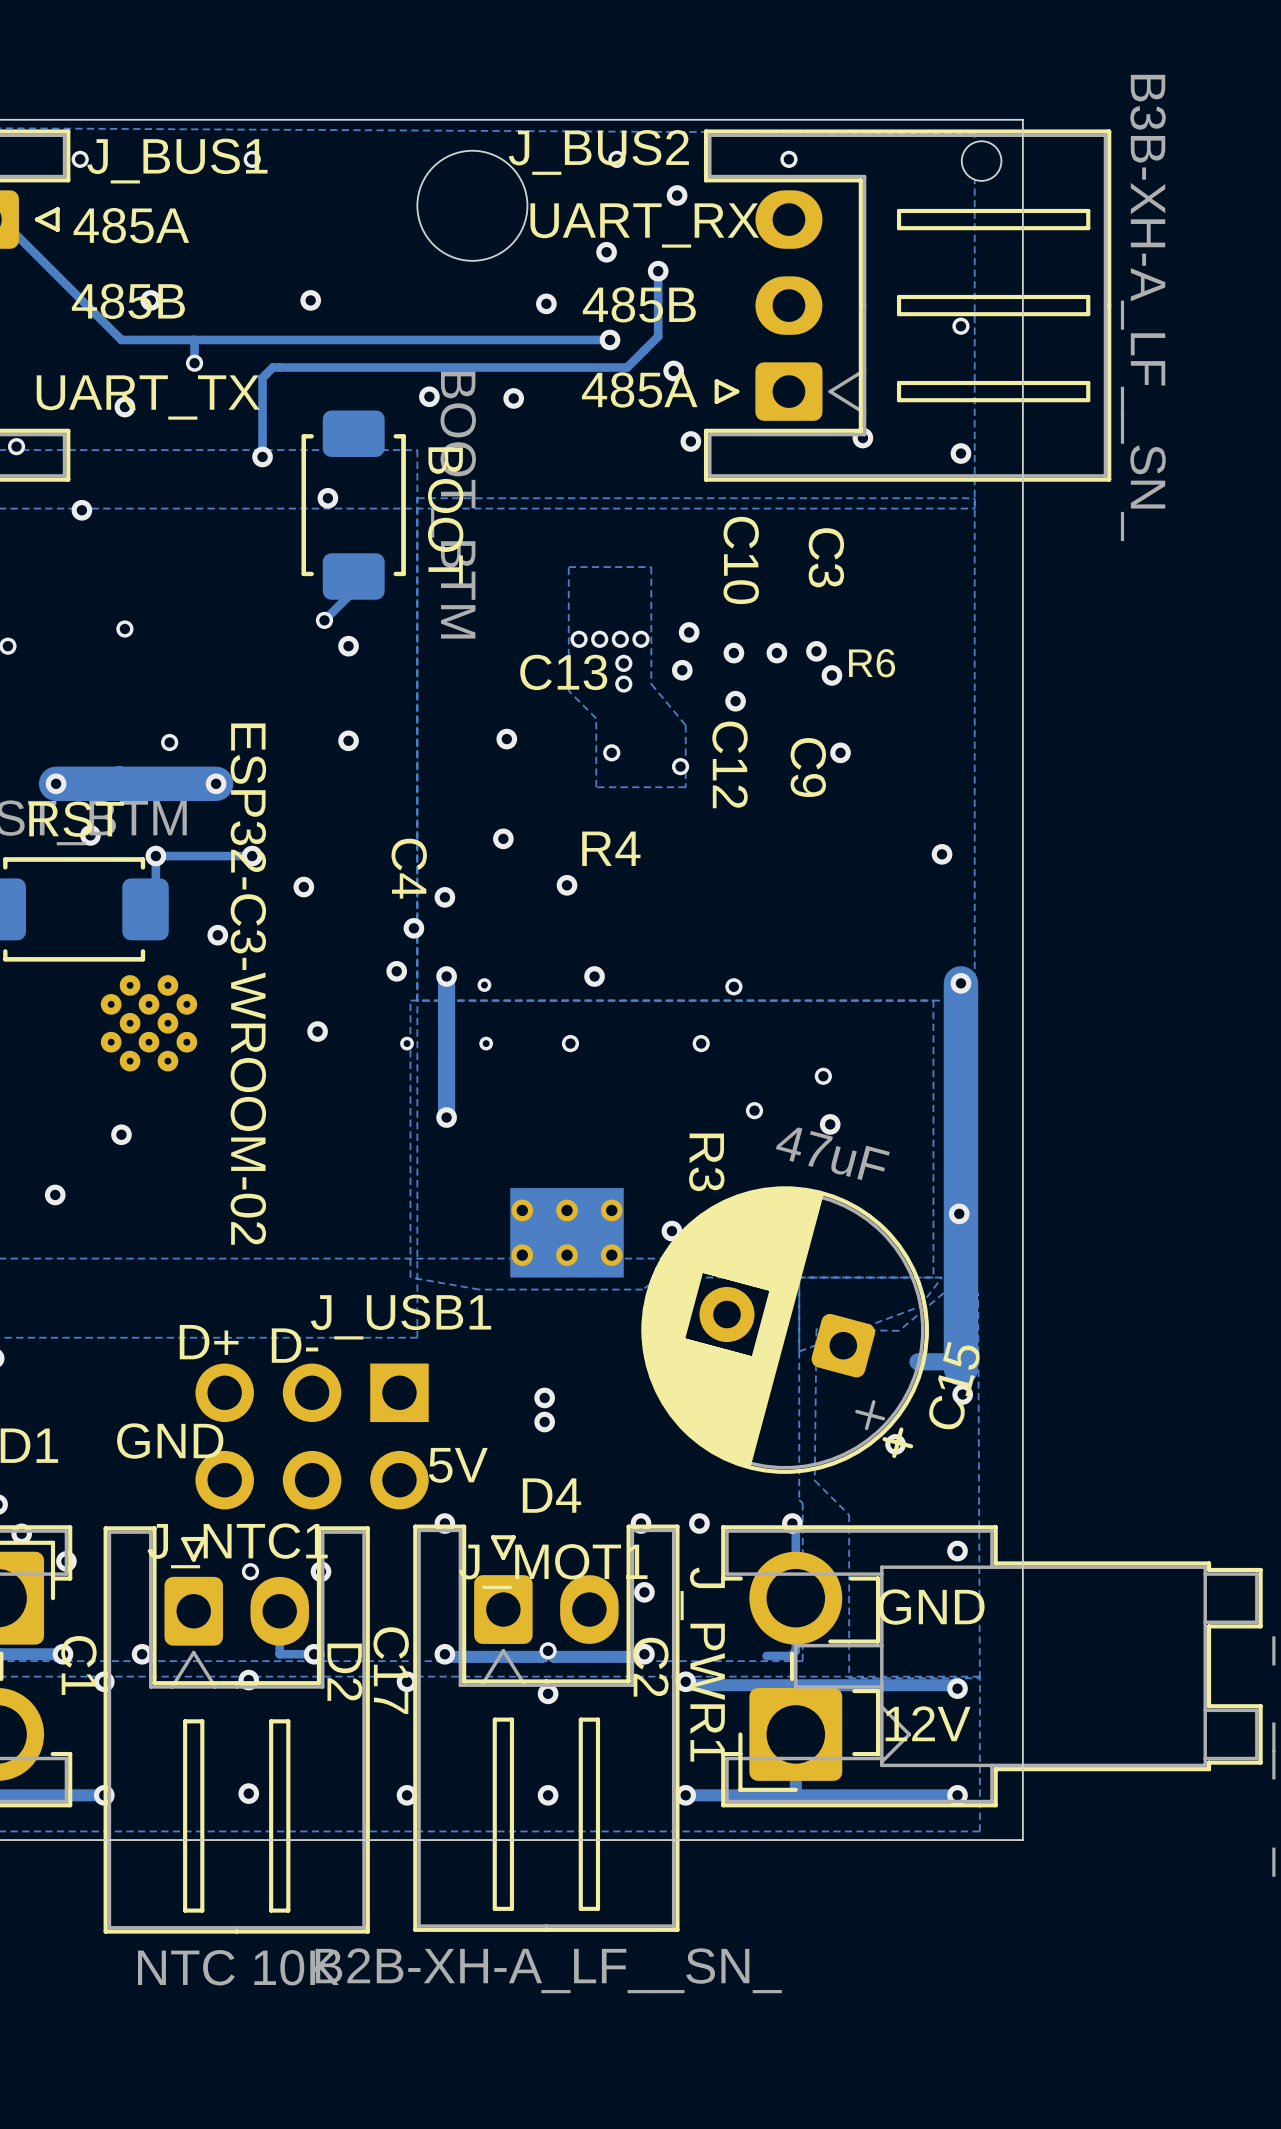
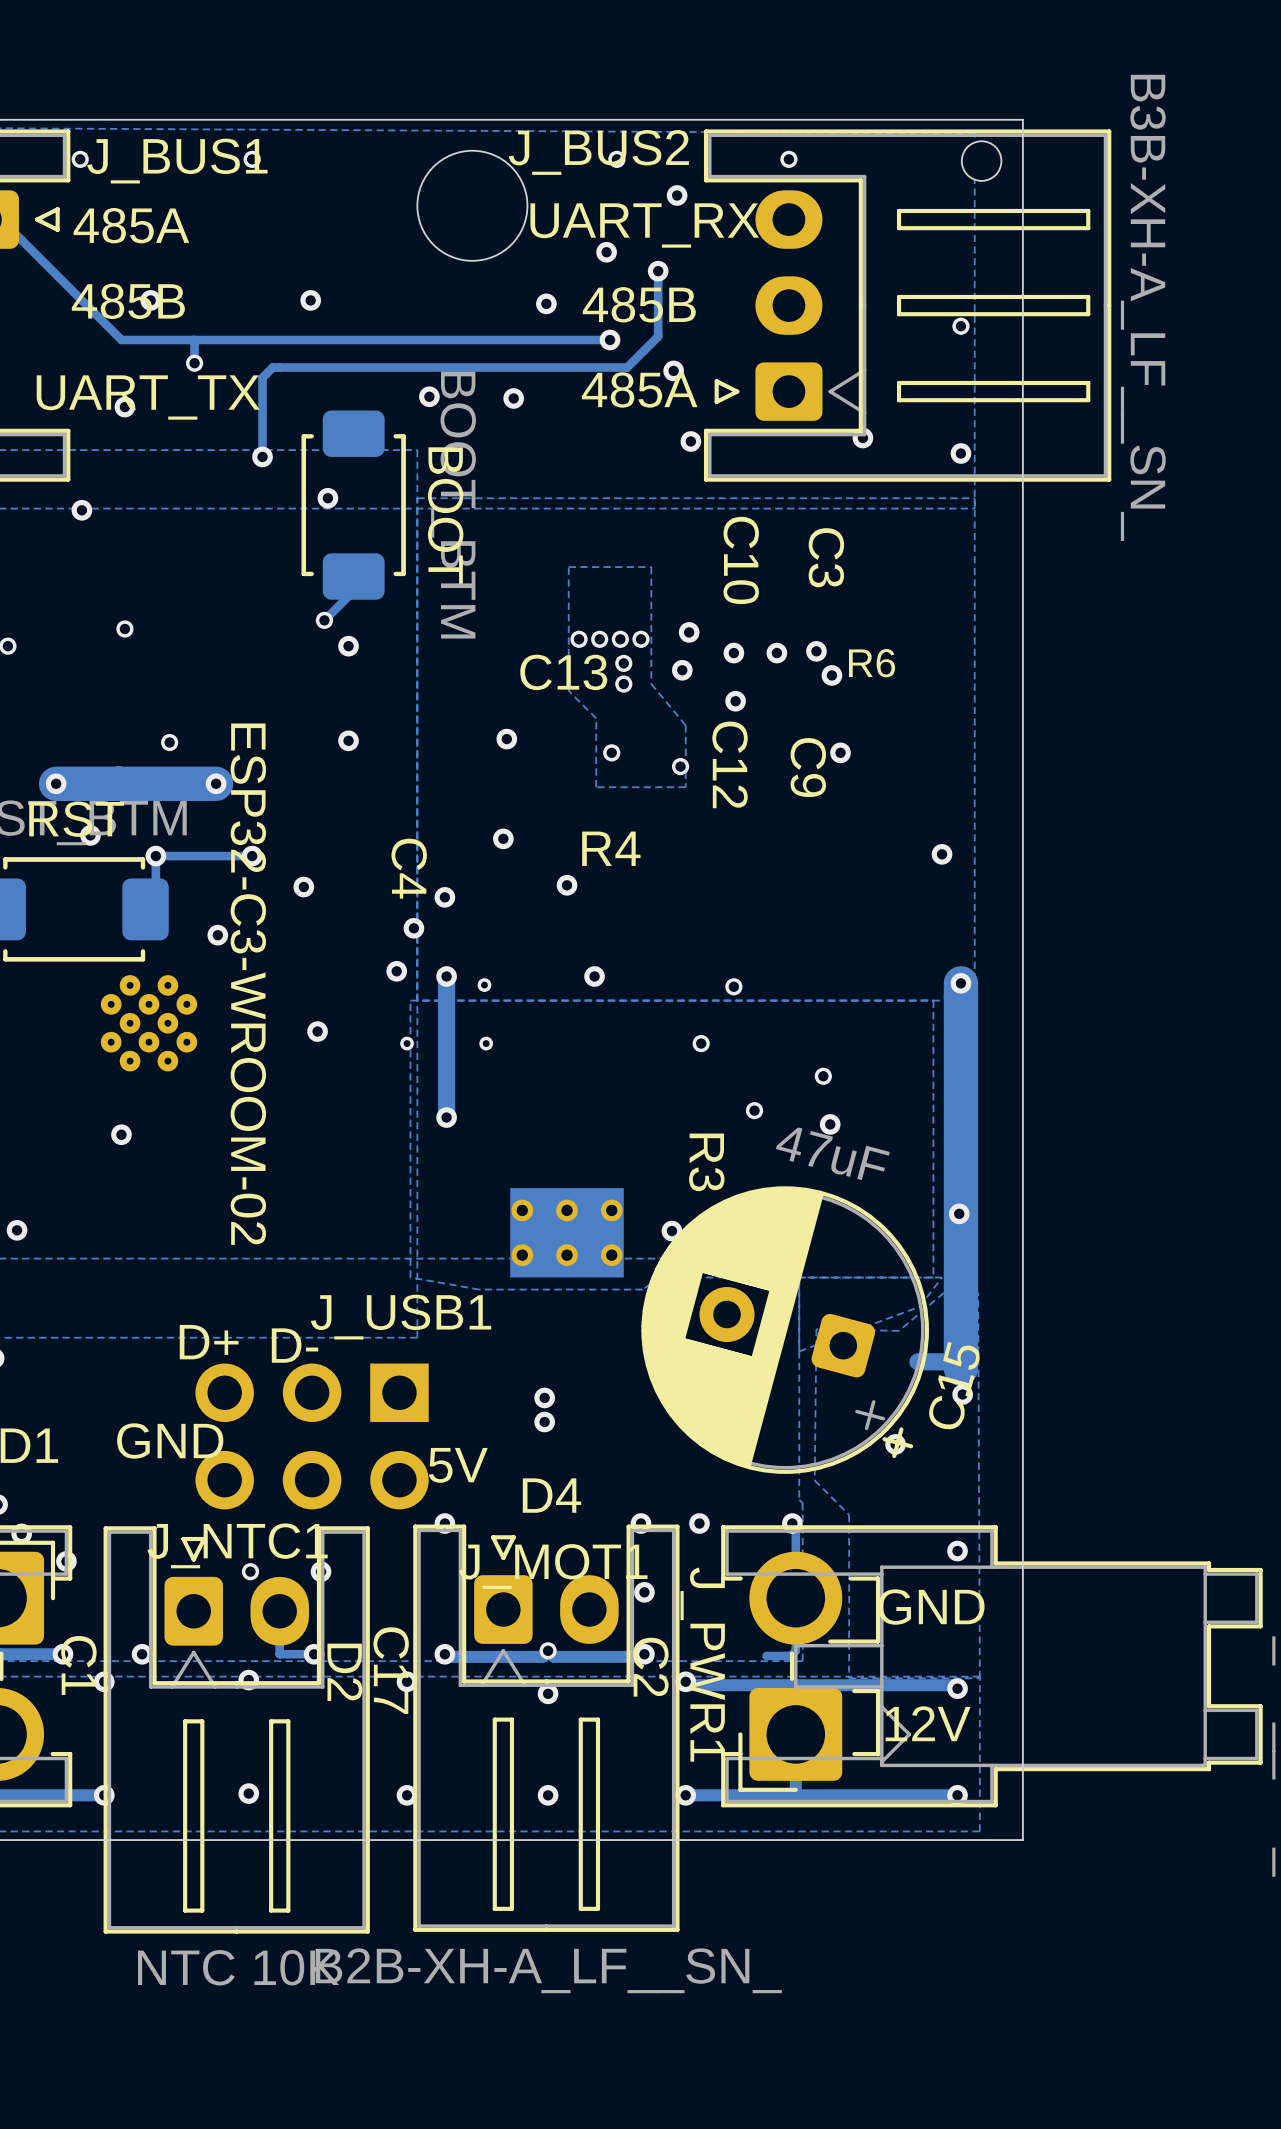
via: (16, 446) -> none
via: (570, 1043) -> none
via position: (55, 1194) -> (17, 1230)

